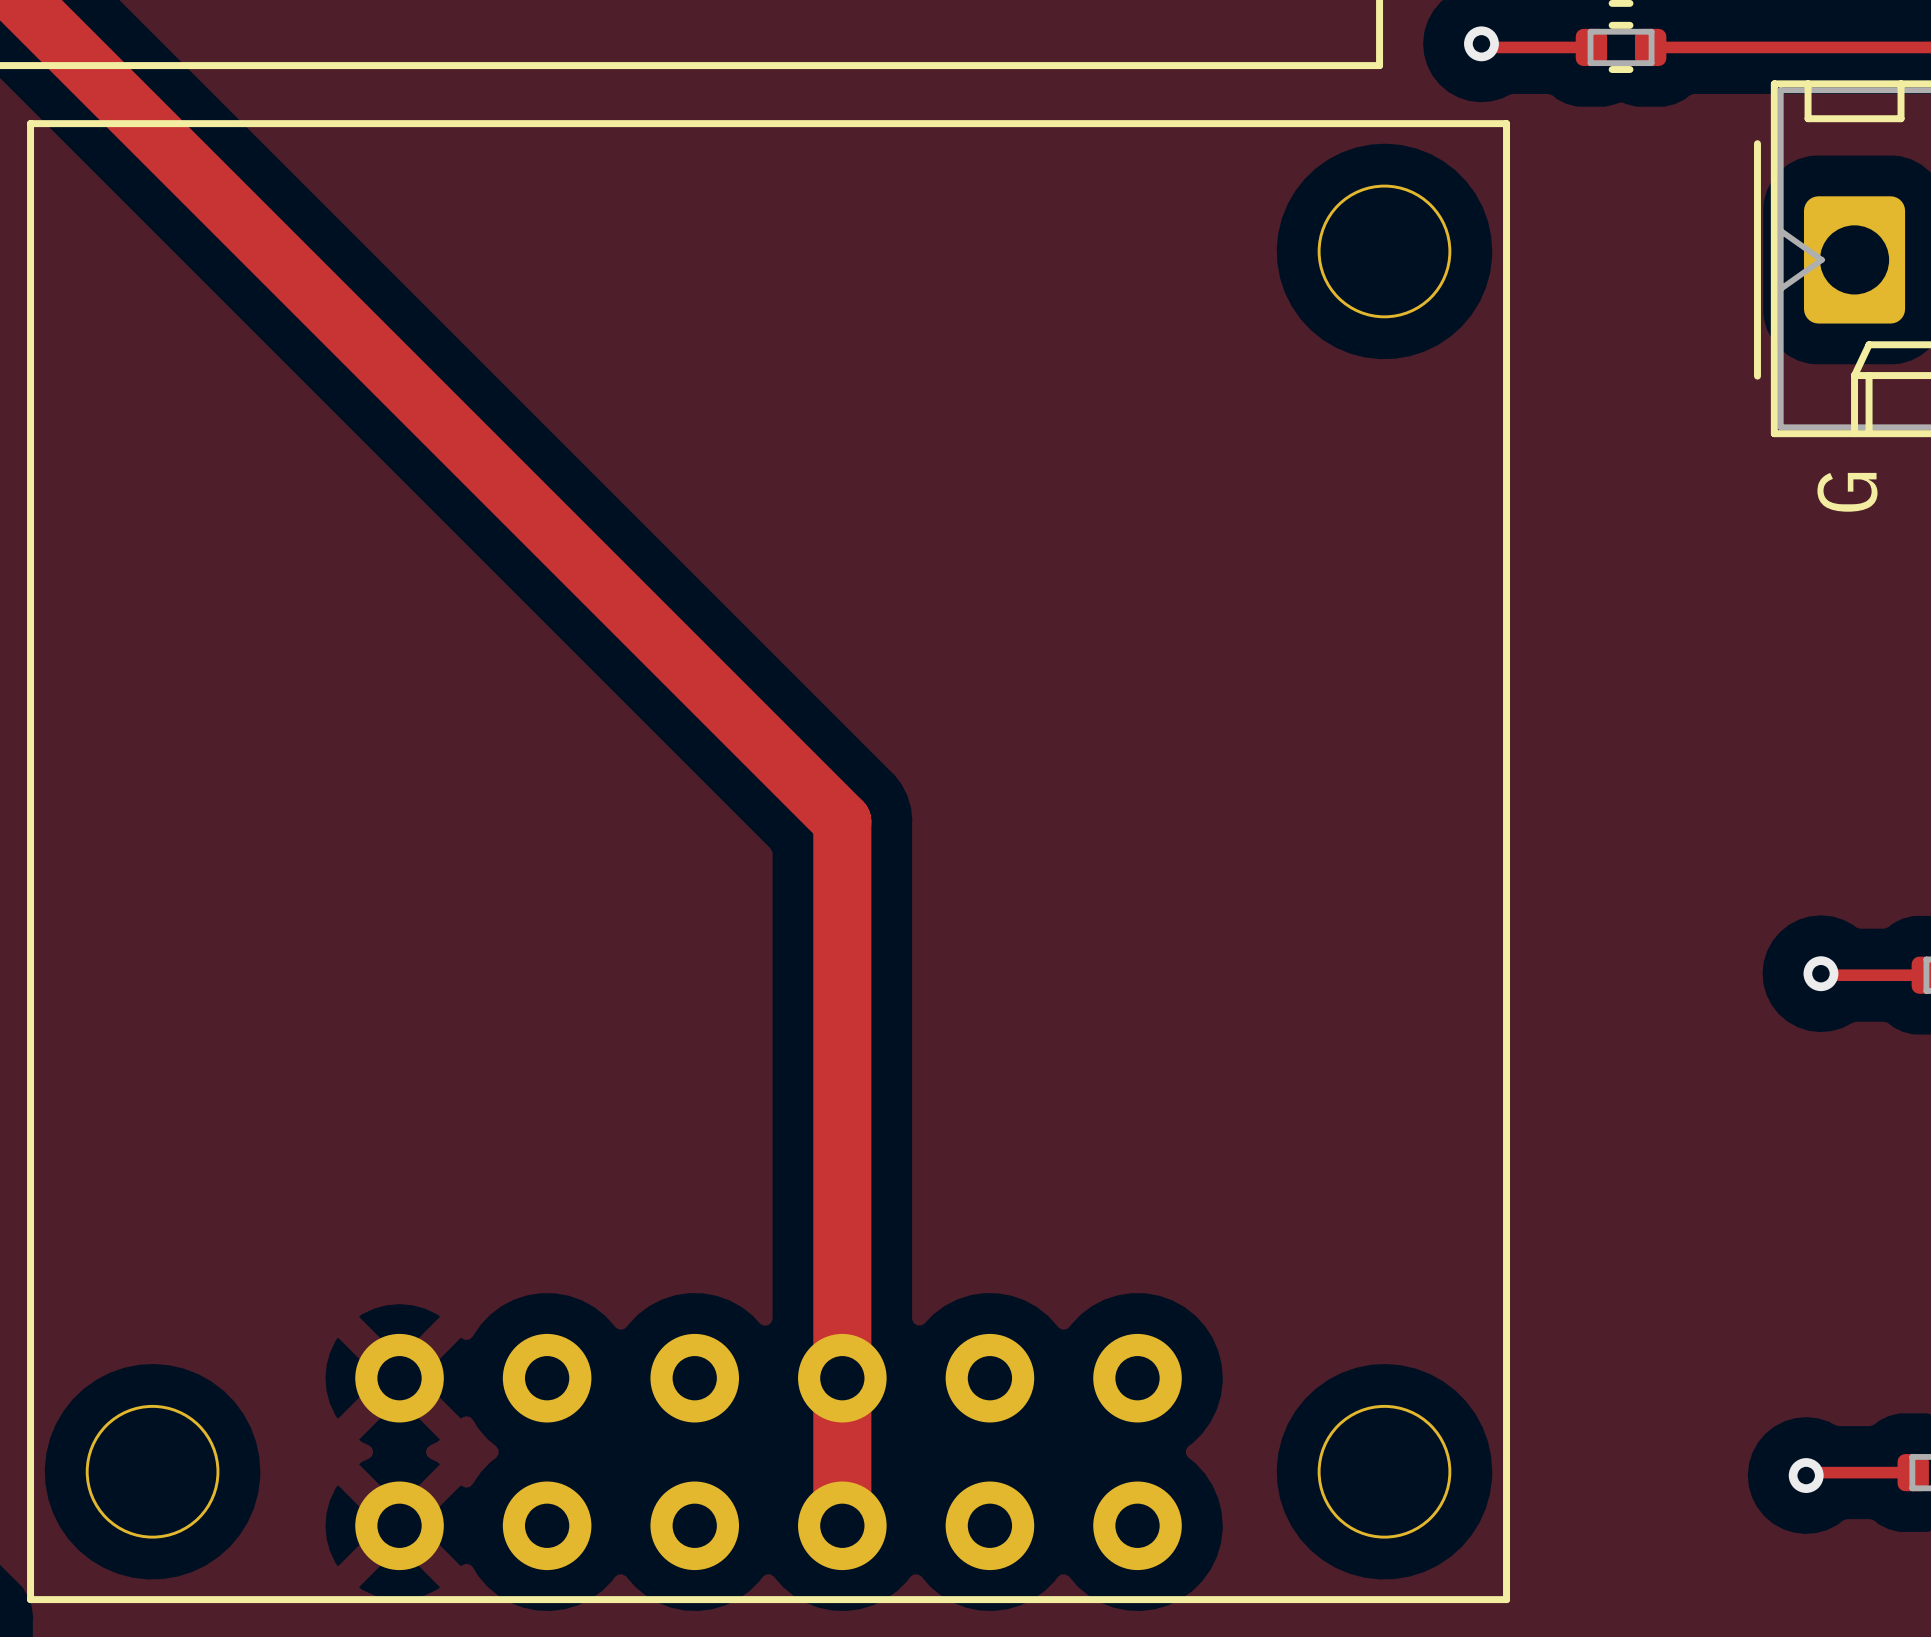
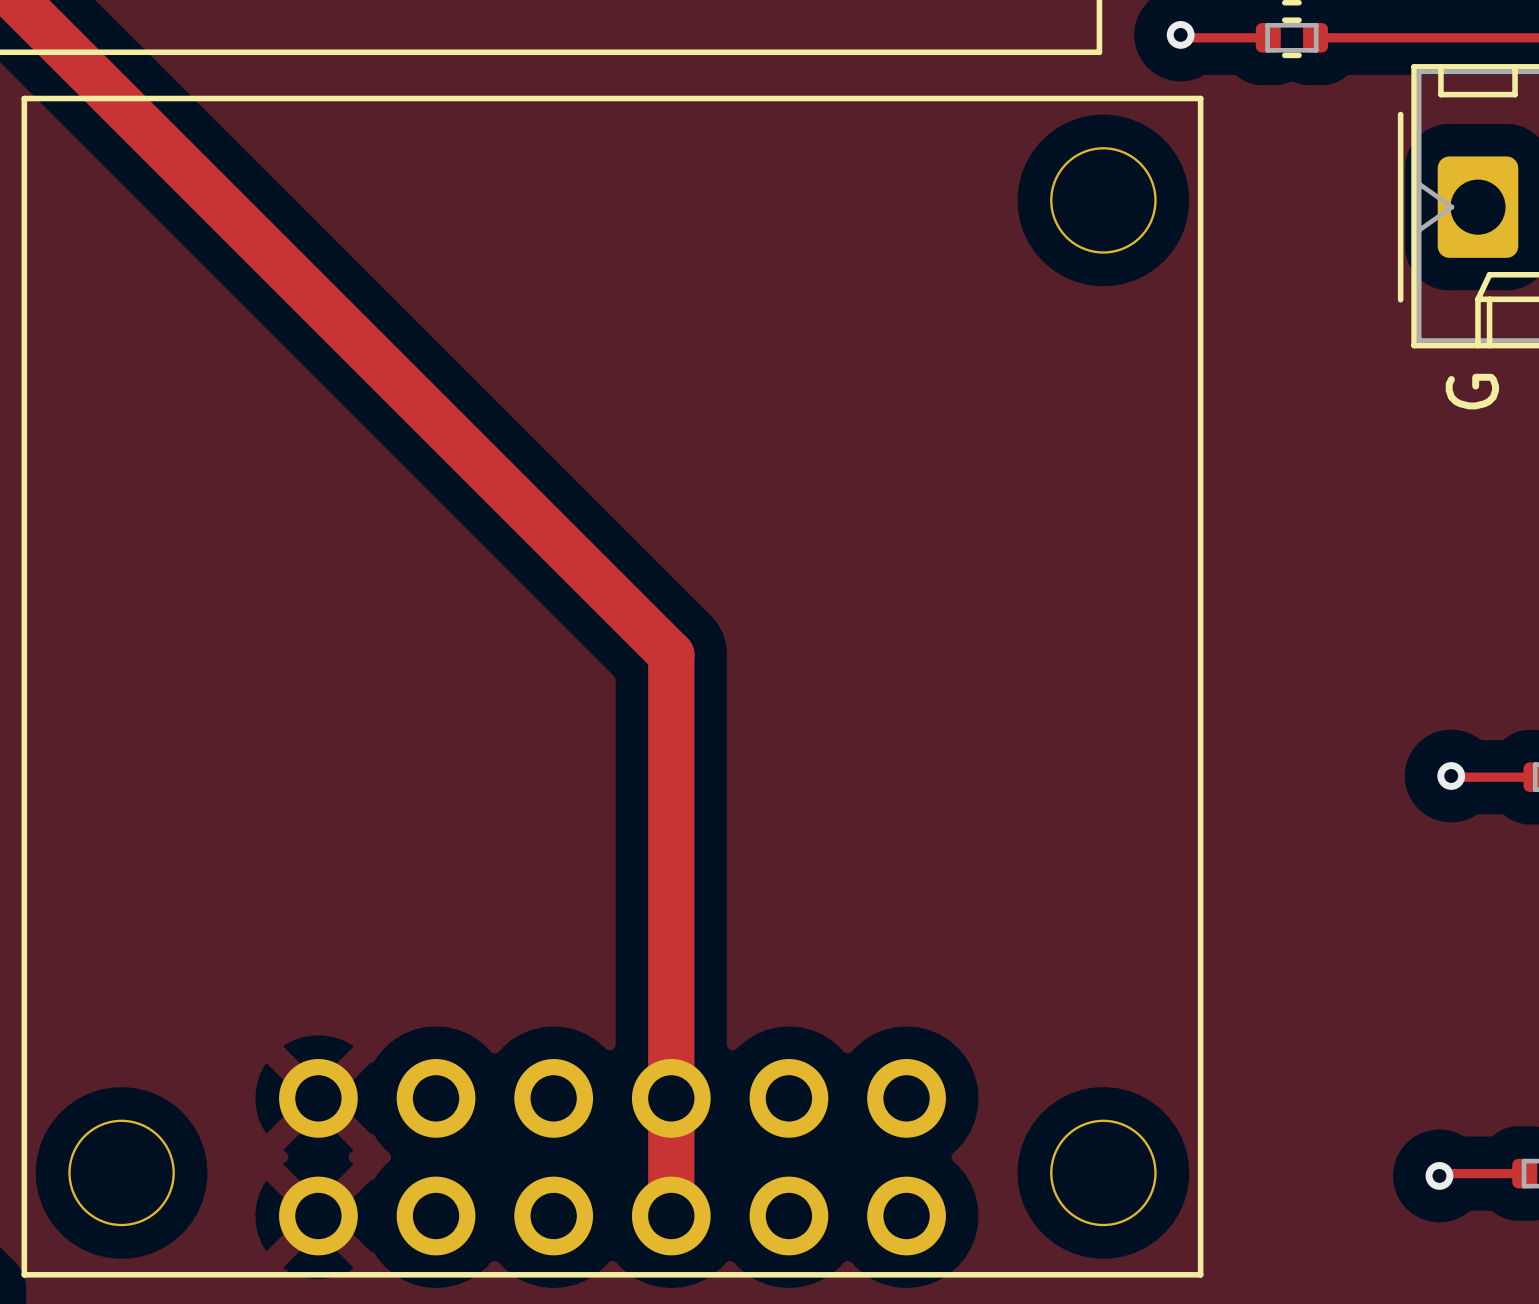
part footprint: [27, 120, 1511, 1604] -> [21, 95, 1204, 1278]

